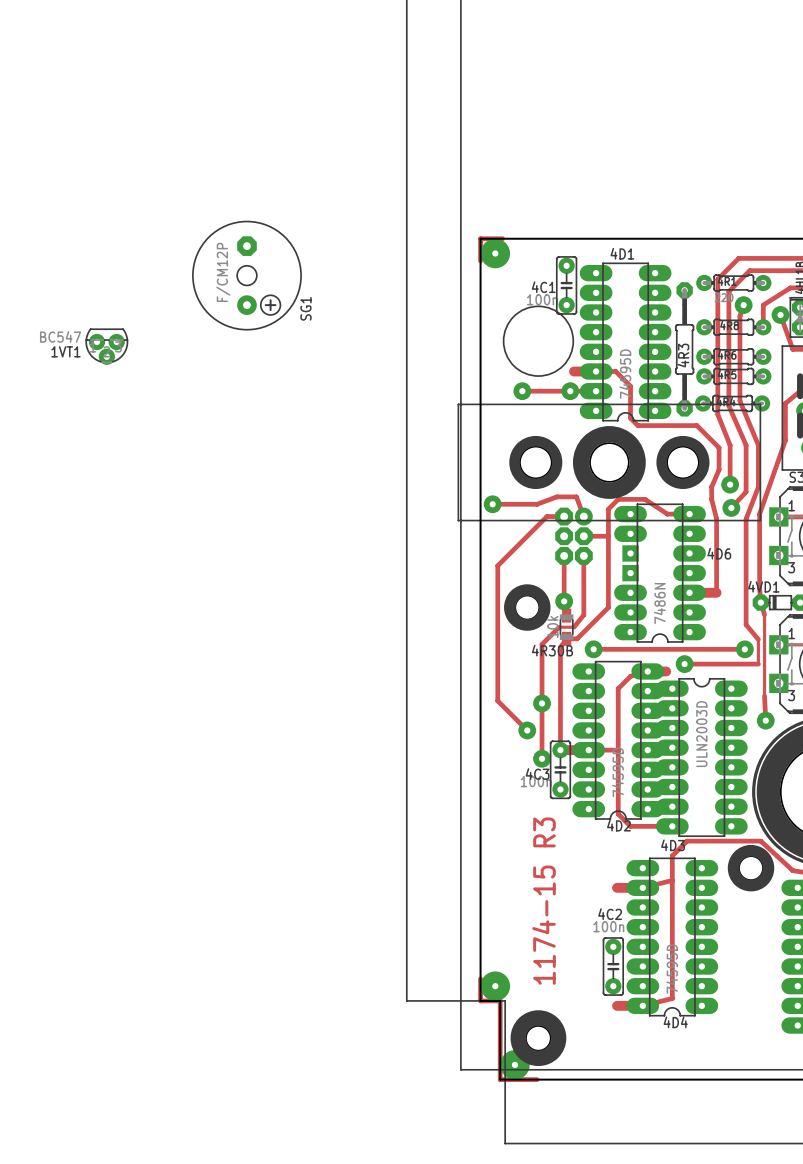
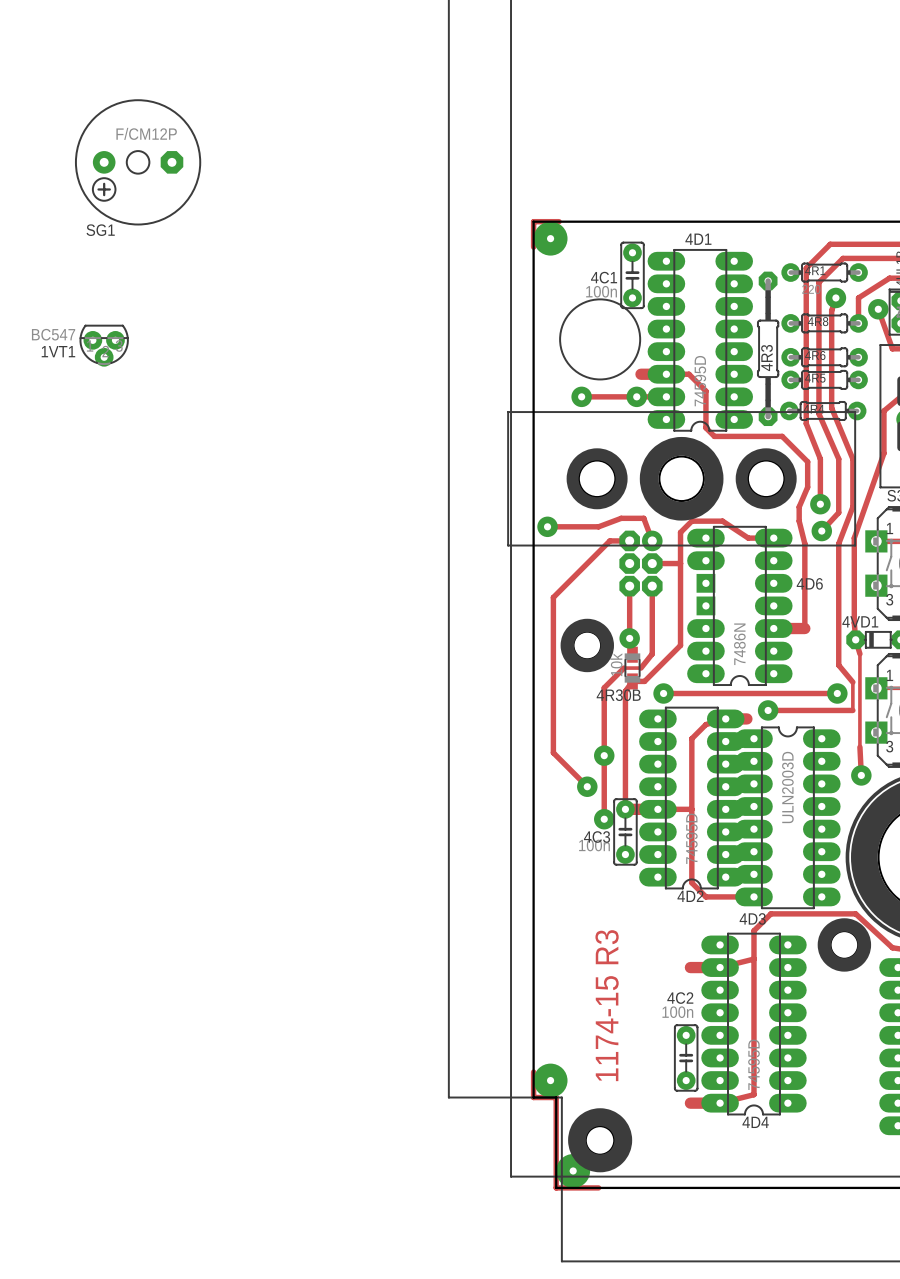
SG1 rotation: 0° (246, 275) -> 90° clockwise (138, 162)
SG1 position: (246, 275) -> (138, 162)

